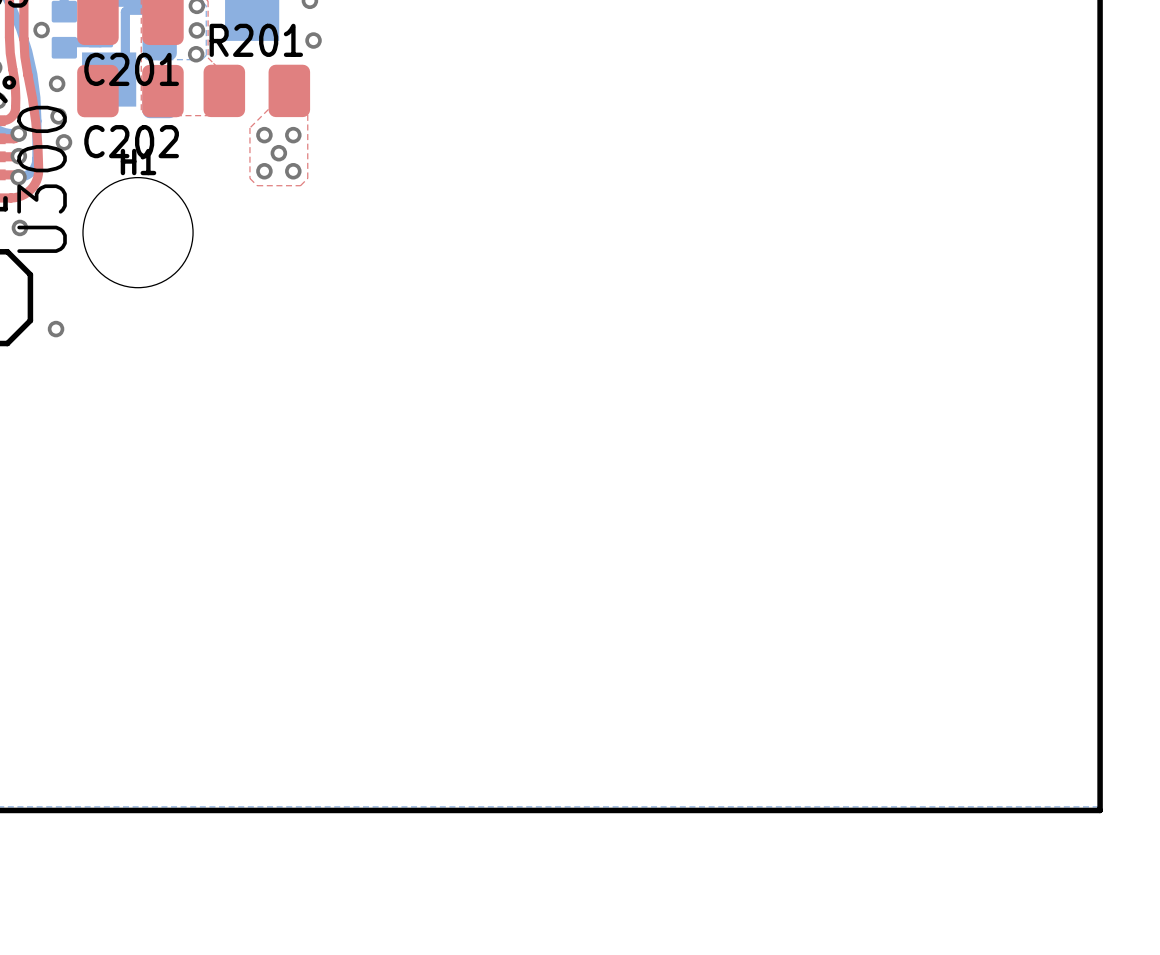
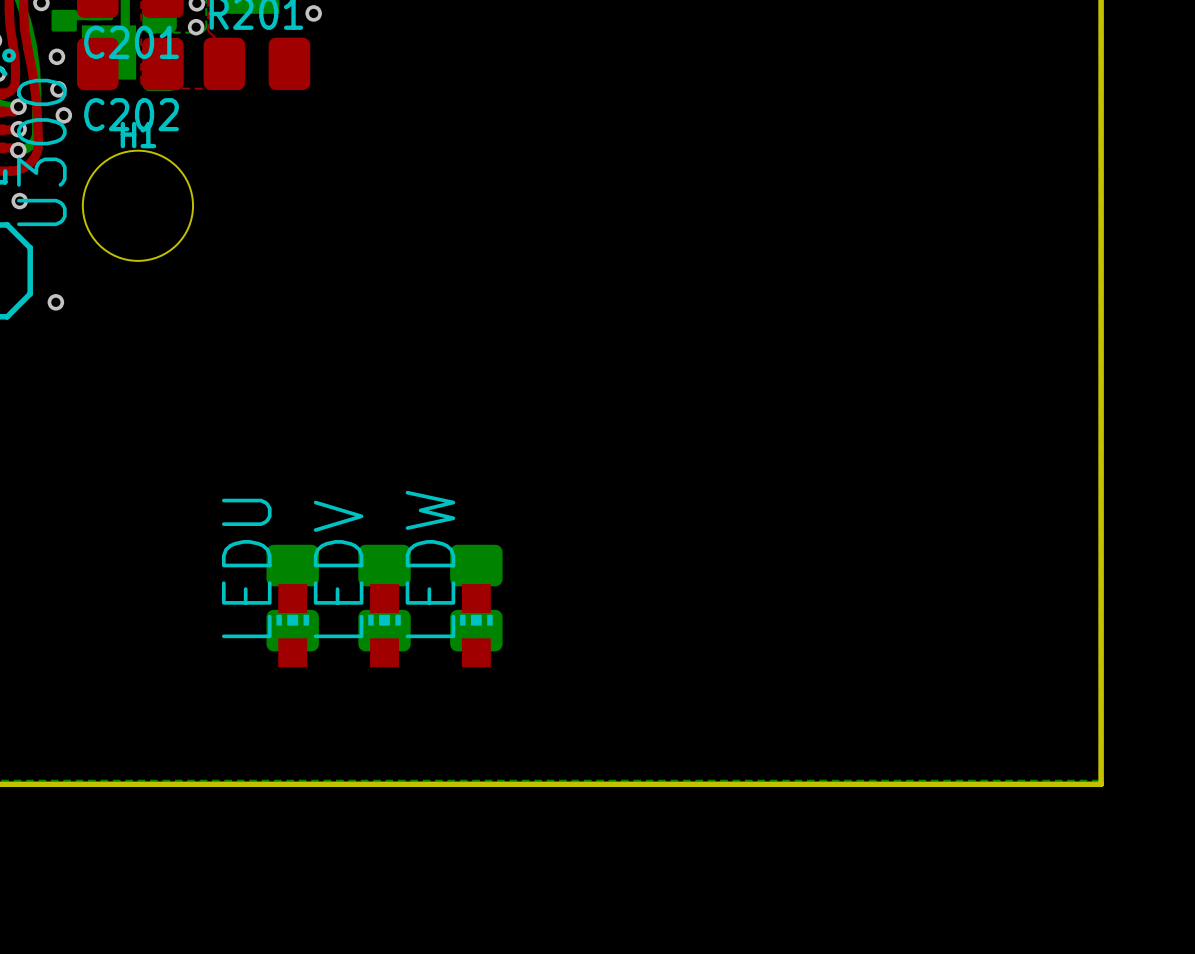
top zone outline: (275, 70) (275, 102) (249, 127) (249, 178) (257, 185) (300, 185) (307, 178) (307, 102) (275, 70) -> none
via: (264, 135) -> none
via: (293, 135) -> none
via: (278, 153) -> none
via: (264, 171) -> none
via: (293, 171) -> none
part: none -> (292, 598)
part: none -> (384, 598)
part: none -> (476, 598)
LEDU: none -> (292, 625)
LEDV: none -> (384, 625)
LEDW: none -> (476, 625)

